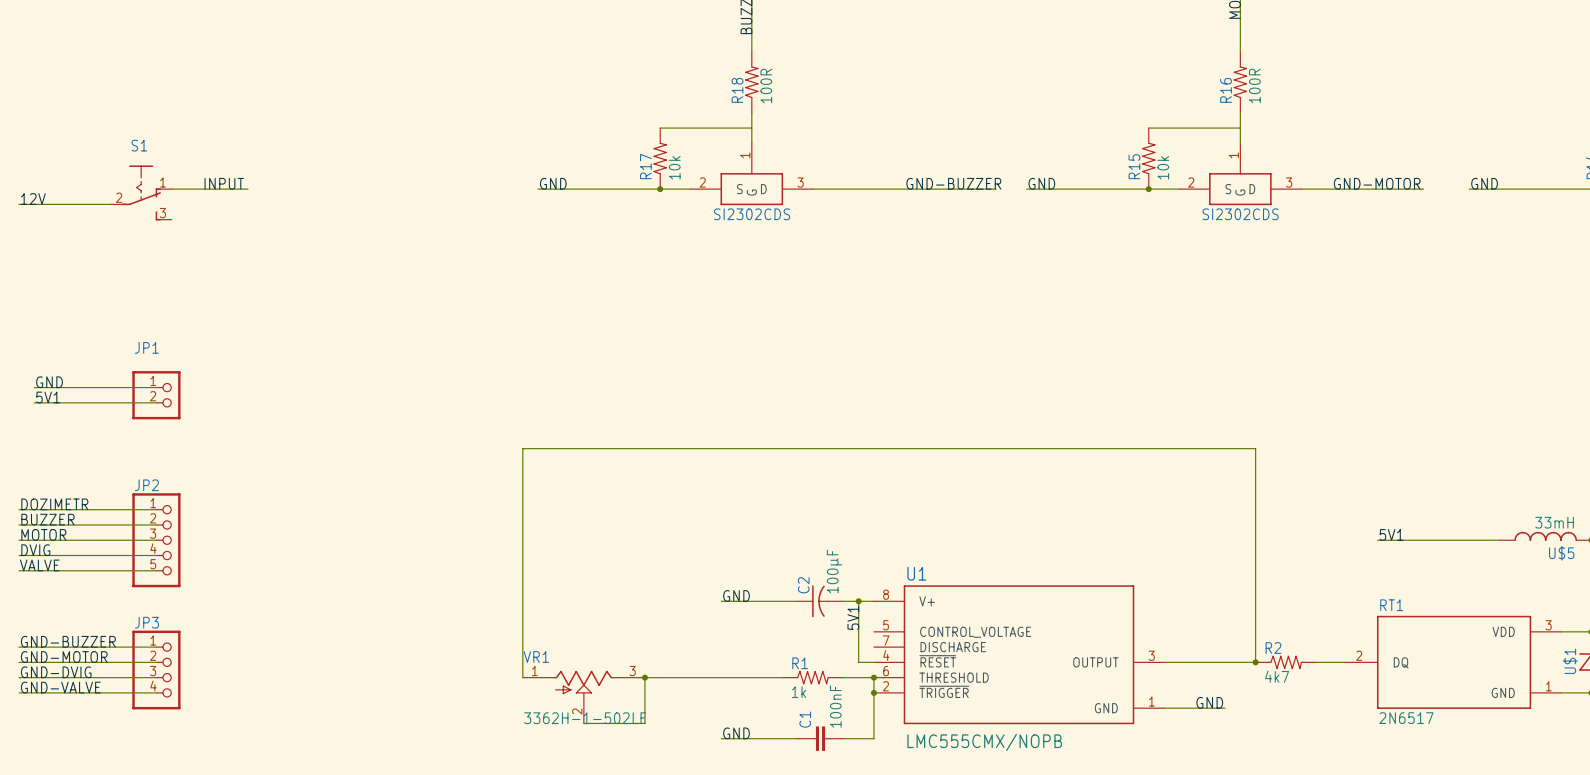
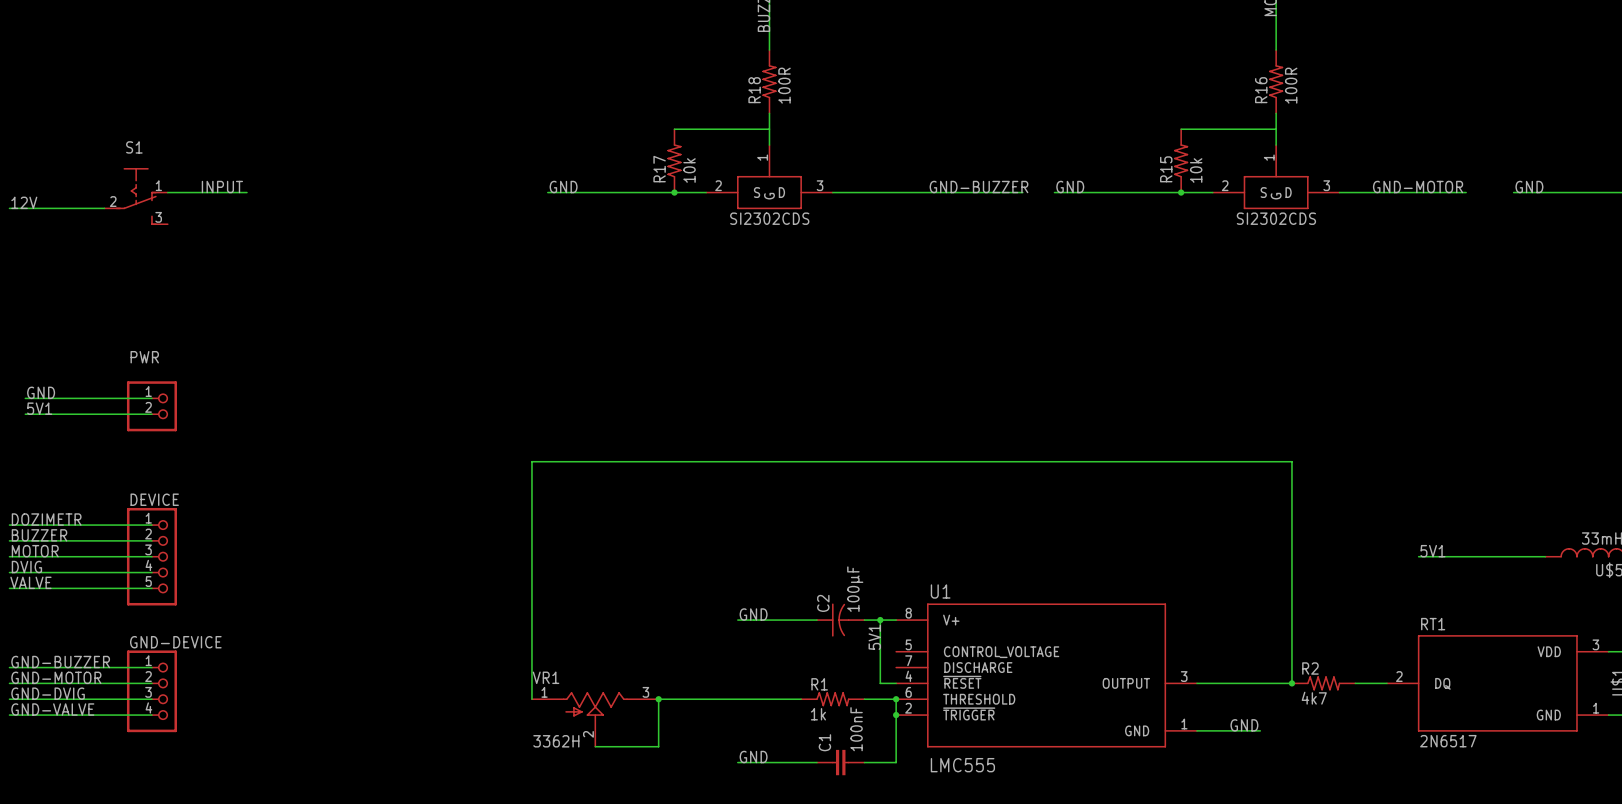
JP1 name: JP1 (146, 347) -> PWR (144, 357)
JP2 name: JP2 (146, 485) -> DEVICE (154, 499)
JP3 name: JP3 (146, 622) -> GND-DEVICE (175, 642)
VR1 value: 3362H-1-502LF (585, 718) -> 3362H (556, 741)
U1 value: LMC555CMX/NOPB (984, 742) -> LMC555 (962, 765)

